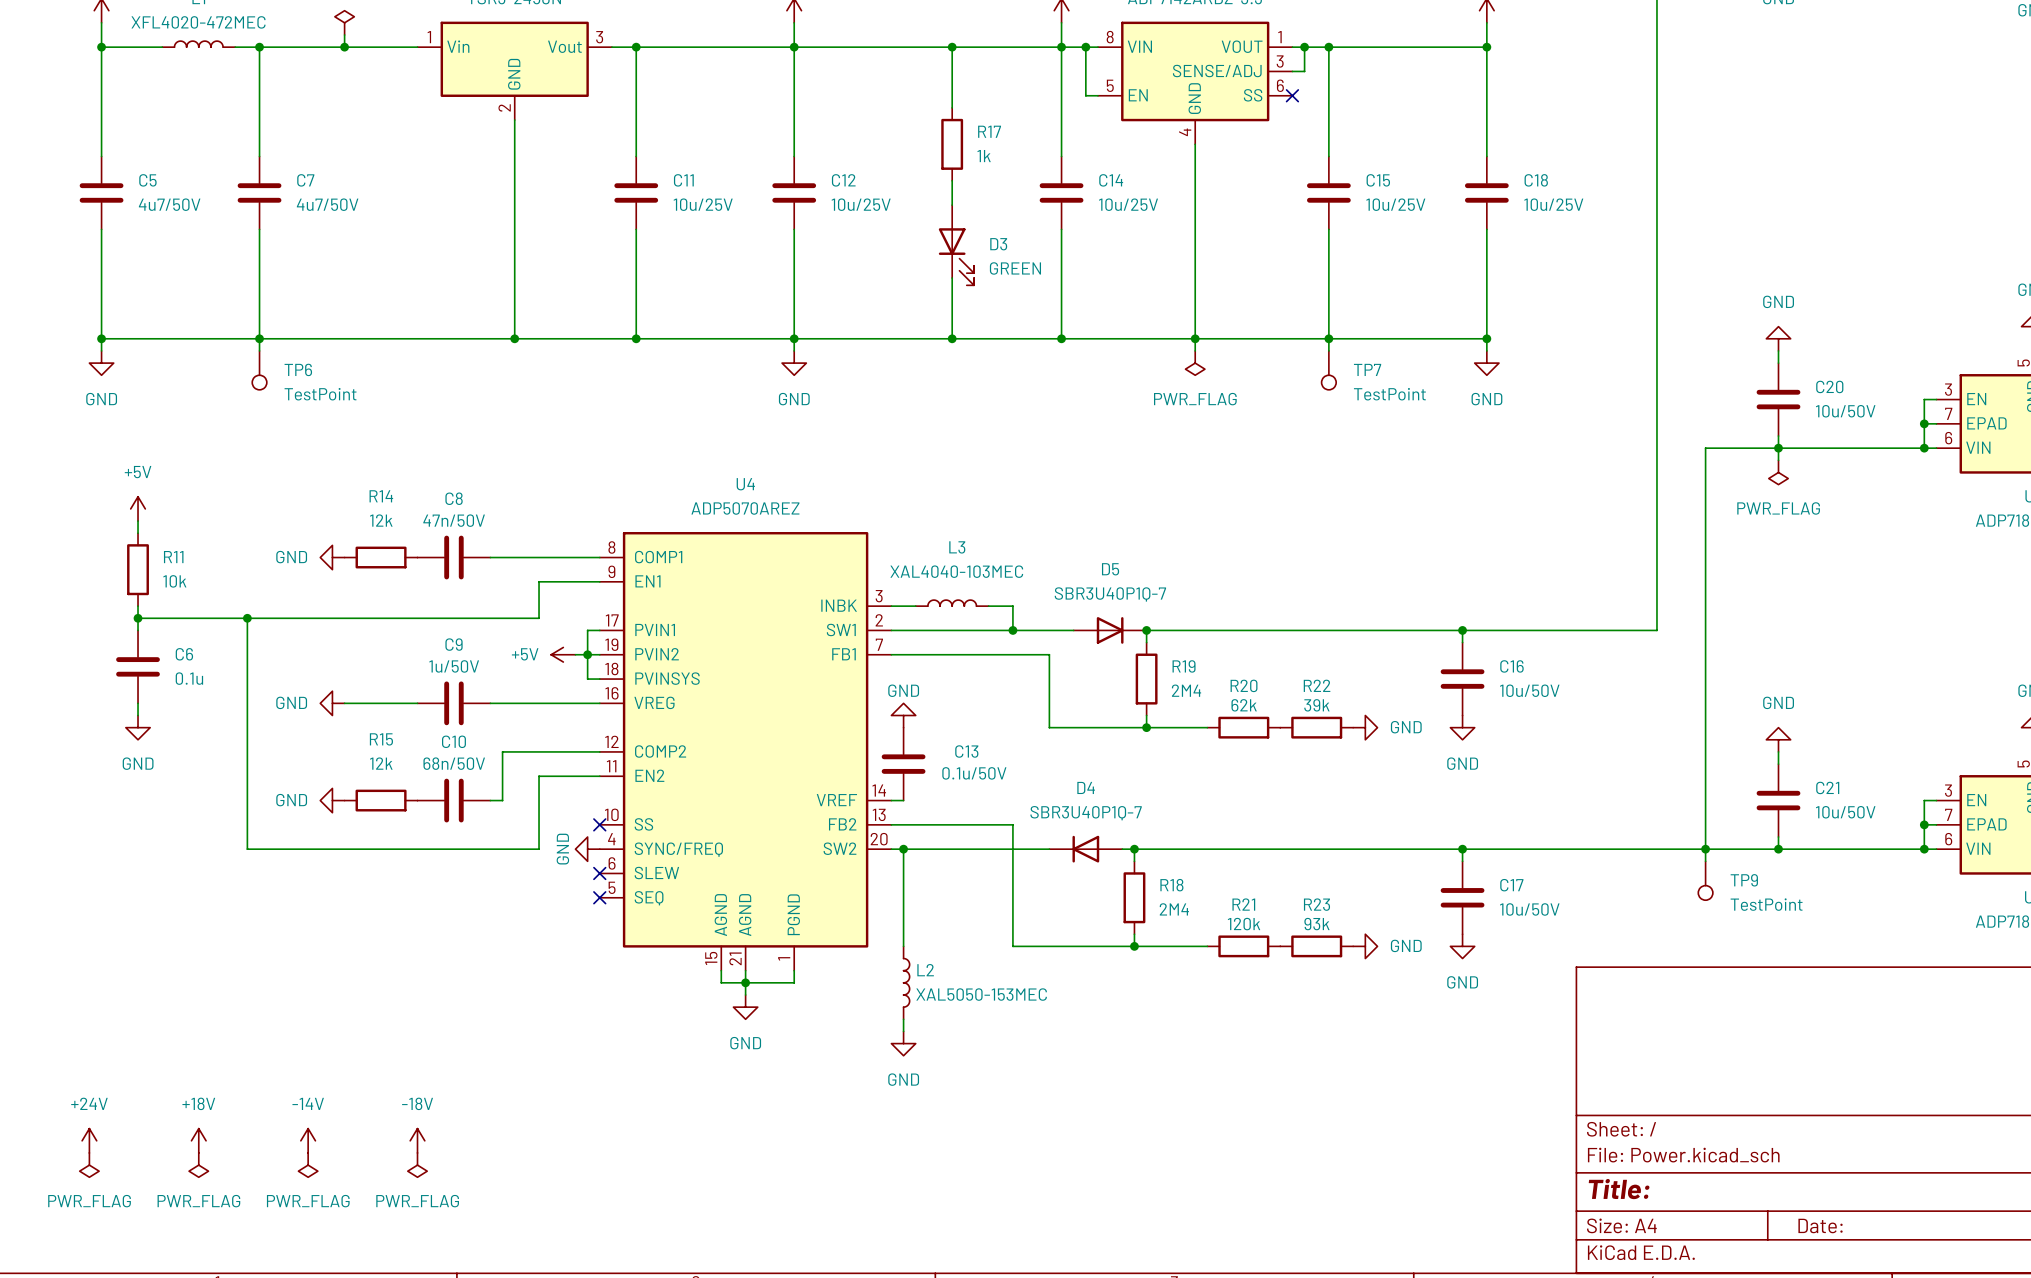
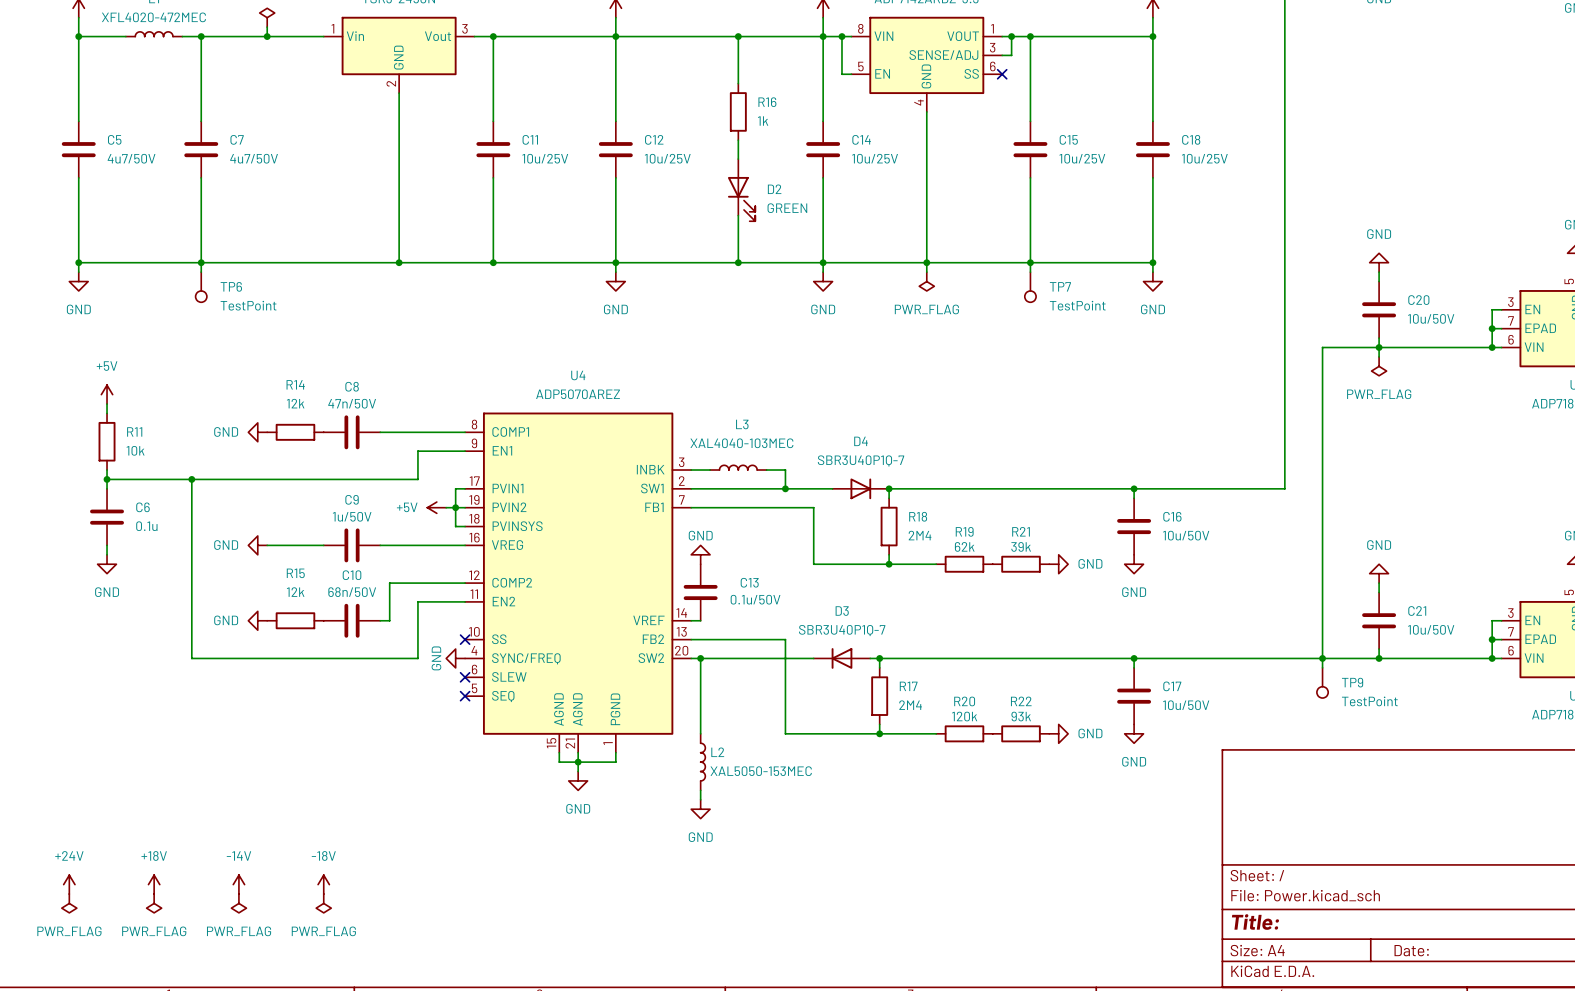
R17 name: R17 (989, 131) -> R16 (767, 102)
D3 name: D3 (998, 244) -> D2 (774, 189)
wire: none -> (823, 262) (823, 272)
power symbol: none -> GND (823, 281)
D5 name: D5 (1110, 569) -> D4 (861, 441)
R19 name: R19 (1184, 666) -> R18 (918, 516)
R20 name: R20 (1244, 685) -> R19 (964, 531)
R22 name: R22 (1317, 685) -> R21 (1021, 531)
D4 name: D4 (1086, 787) -> D3 (842, 611)
R18 name: R18 (1171, 885) -> R17 (908, 686)
R21 name: R21 (1243, 904) -> R20 (964, 701)
R23 name: R23 (1316, 904) -> R22 (1021, 701)

